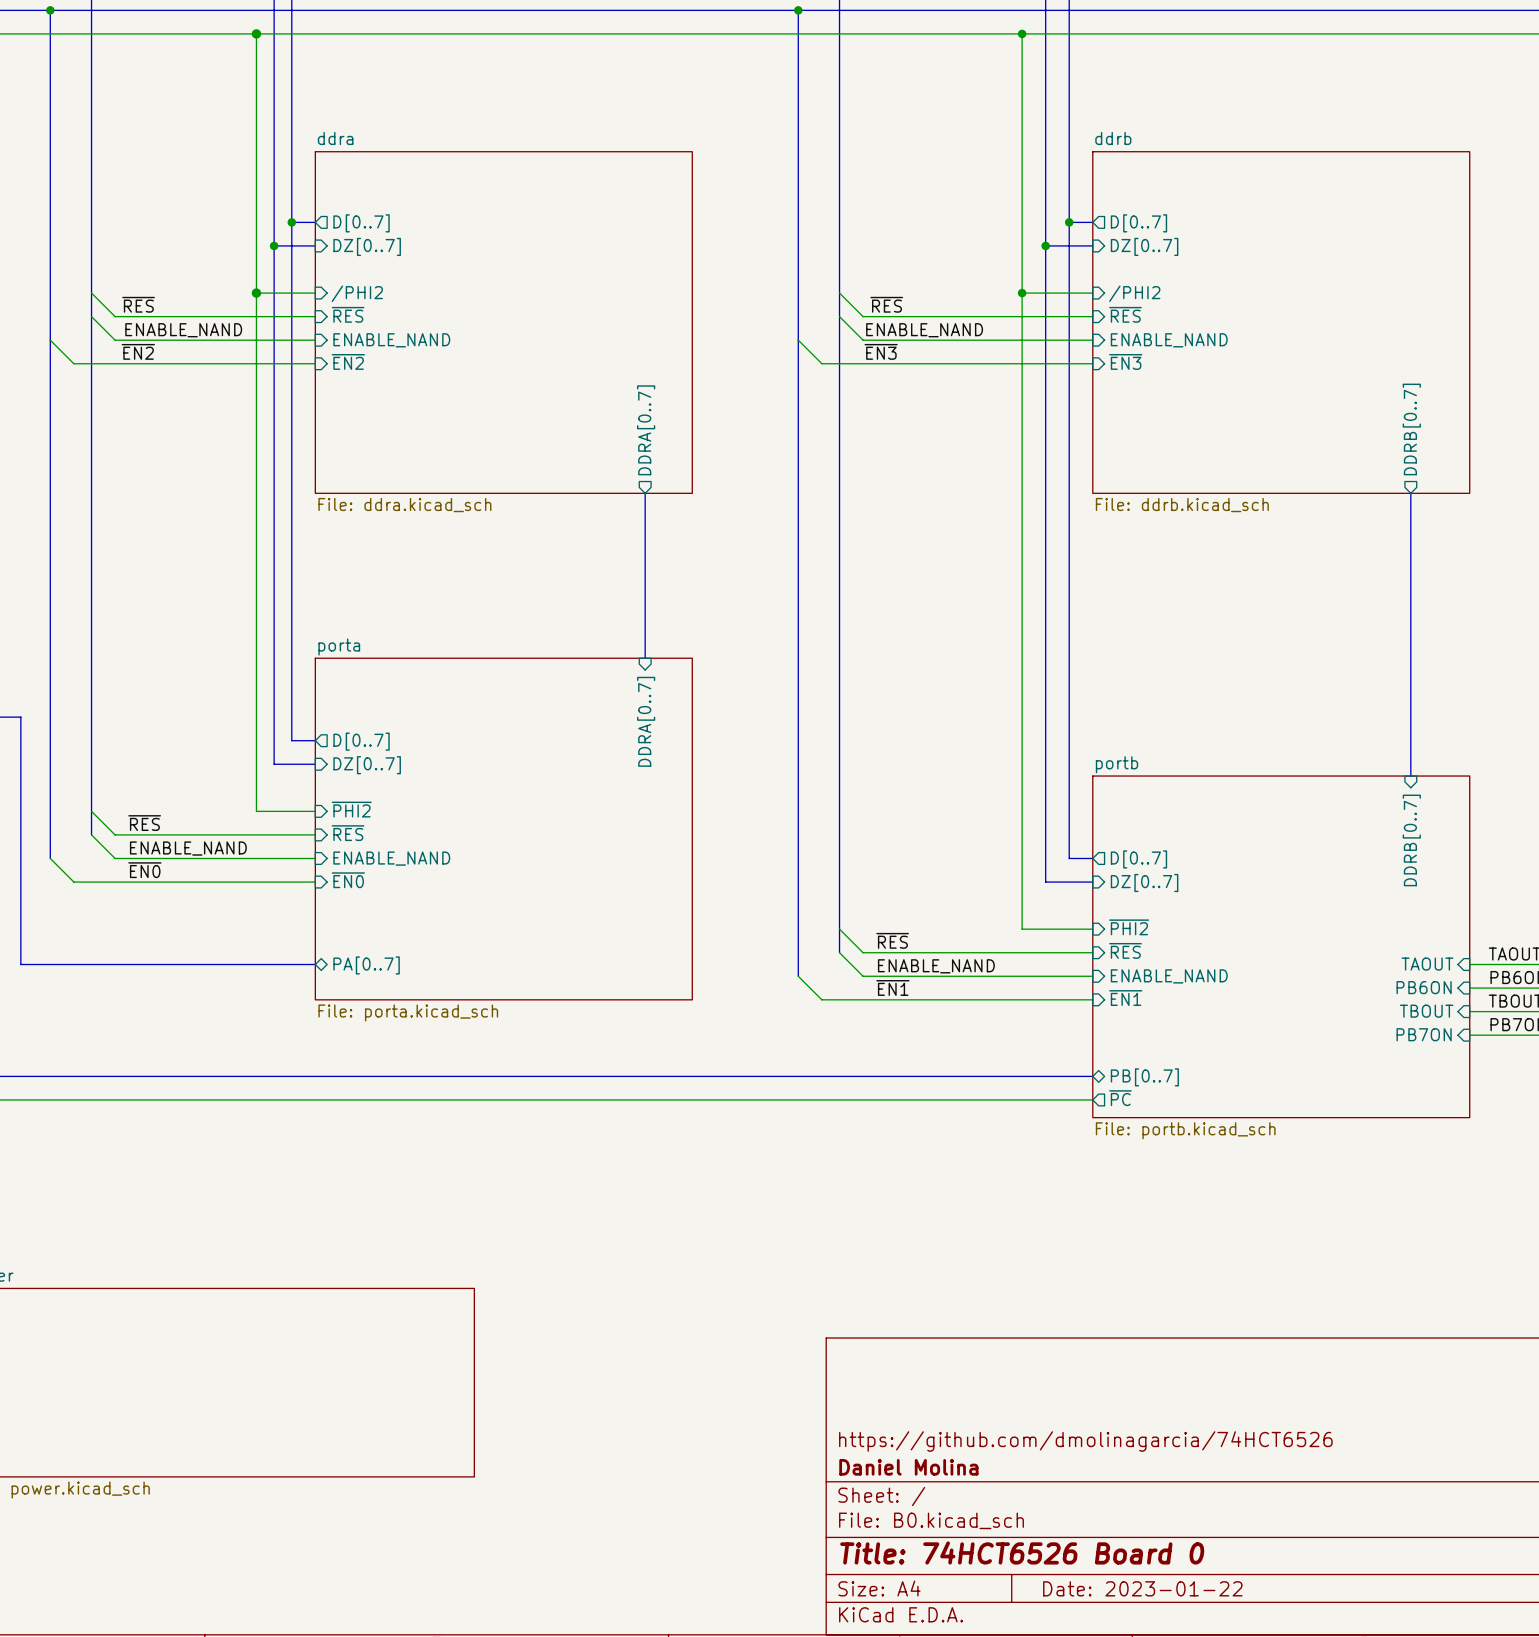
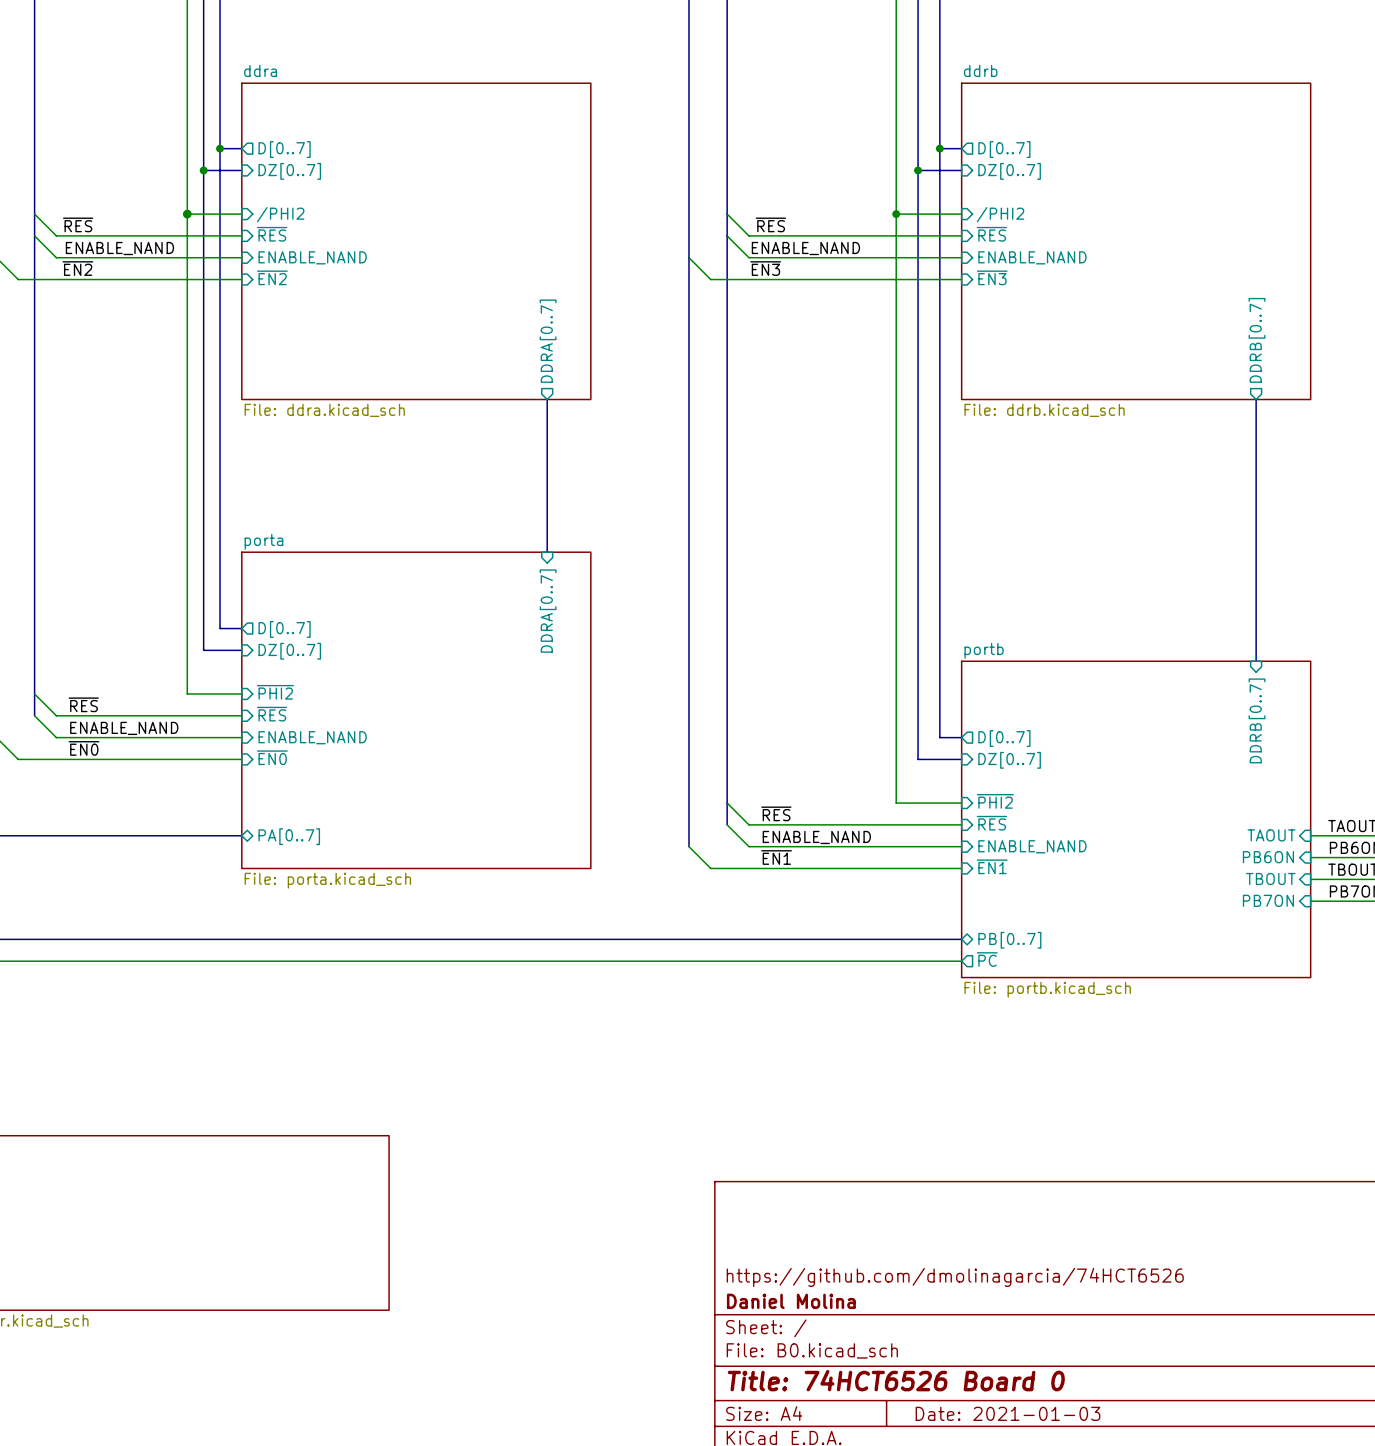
title block: Date: 2023-01-22 (1142, 1588) -> Date: 2021-01-03 (1007, 1413)

